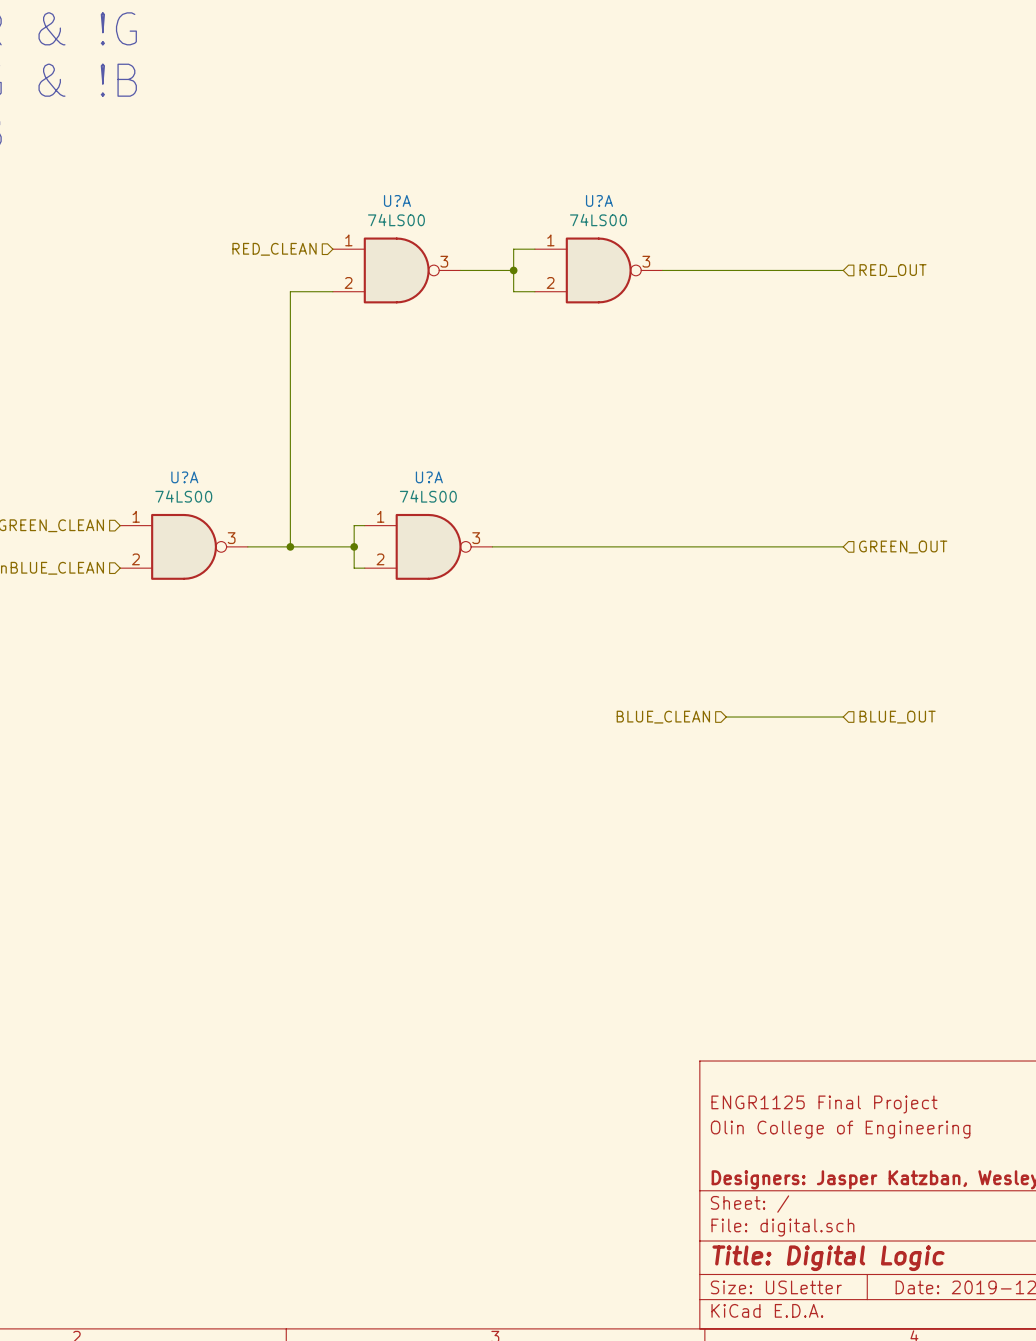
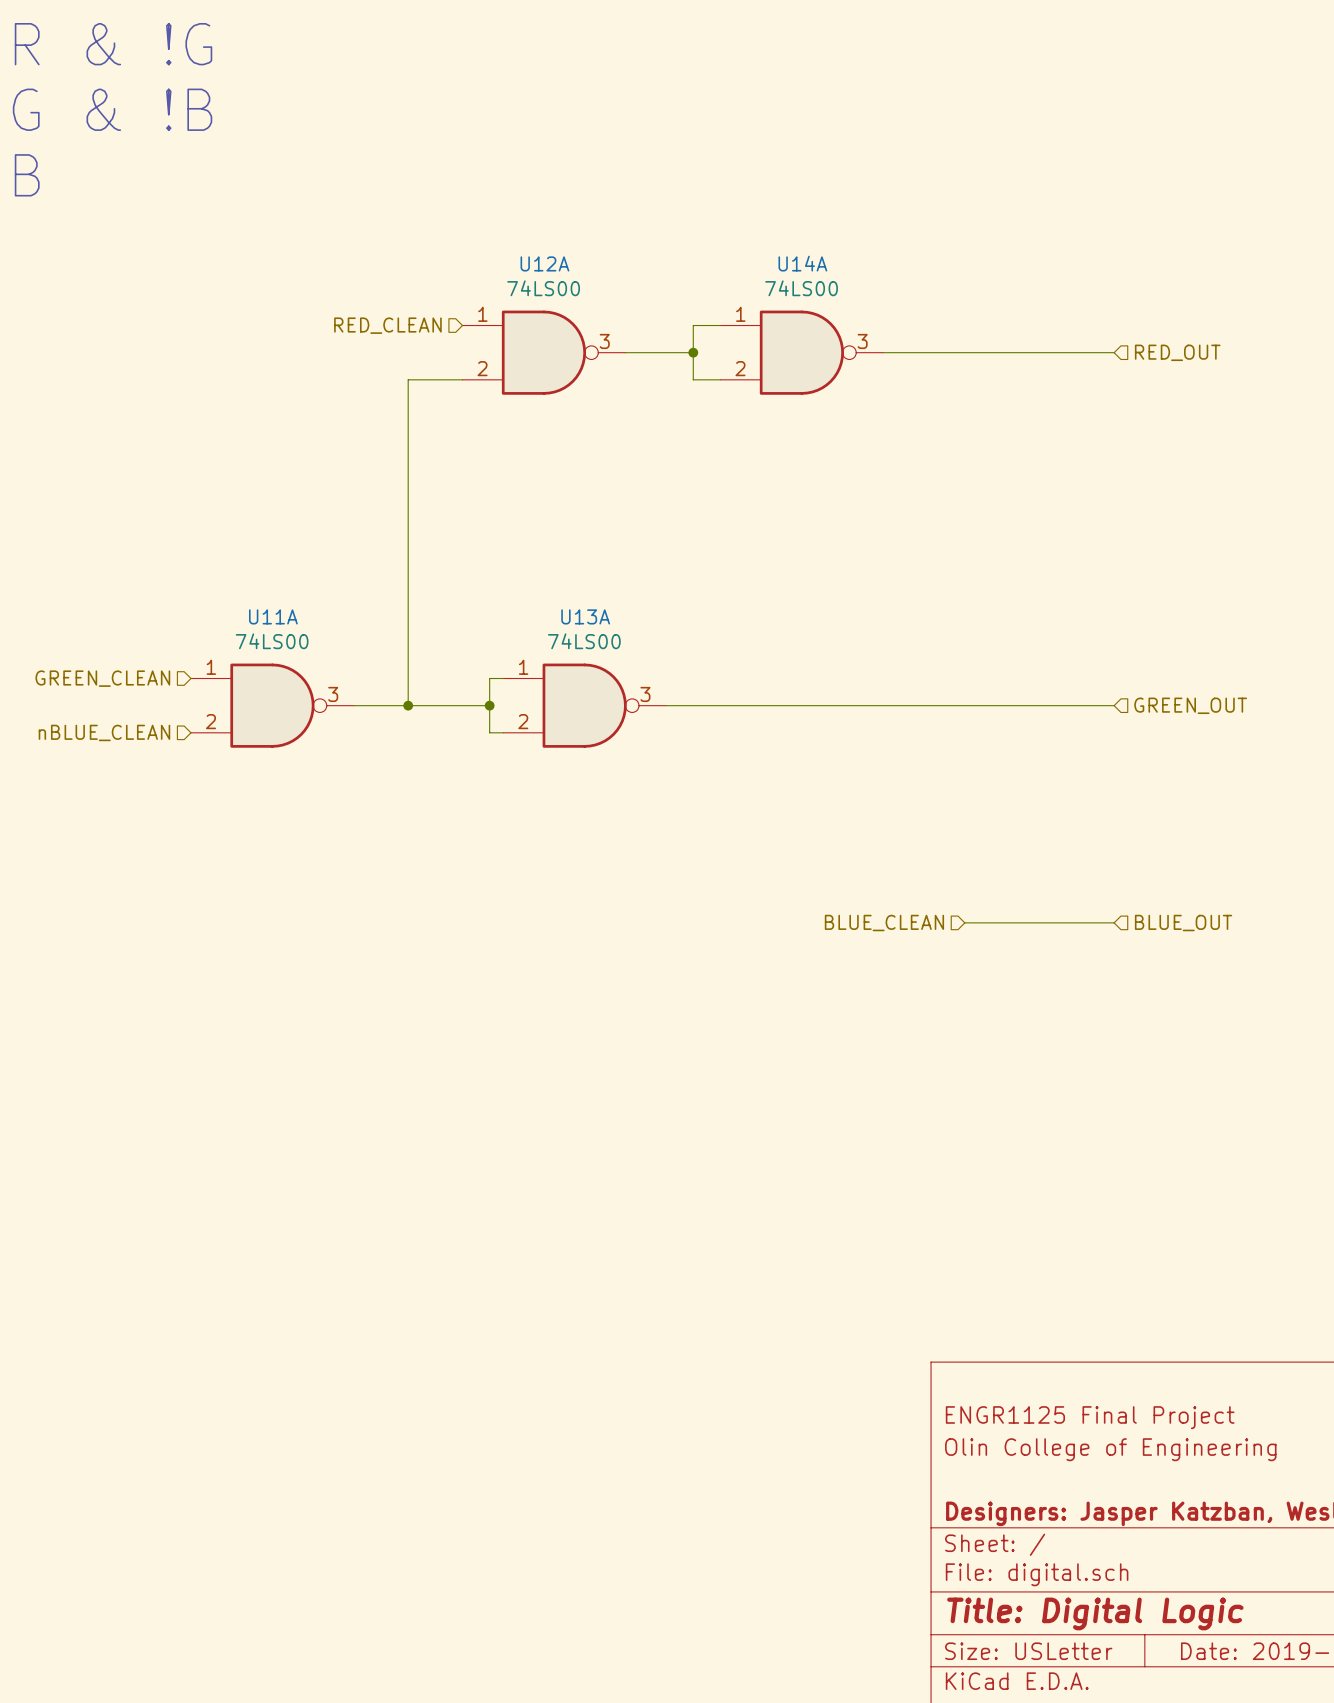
U?A name: U?A (397, 200) -> U12A (544, 263)
U?A name: U?A (599, 200) -> U14A (802, 263)
U?A name: U?A (184, 477) -> U11A (273, 616)
U?A name: U?A (429, 477) -> U13A (585, 616)

